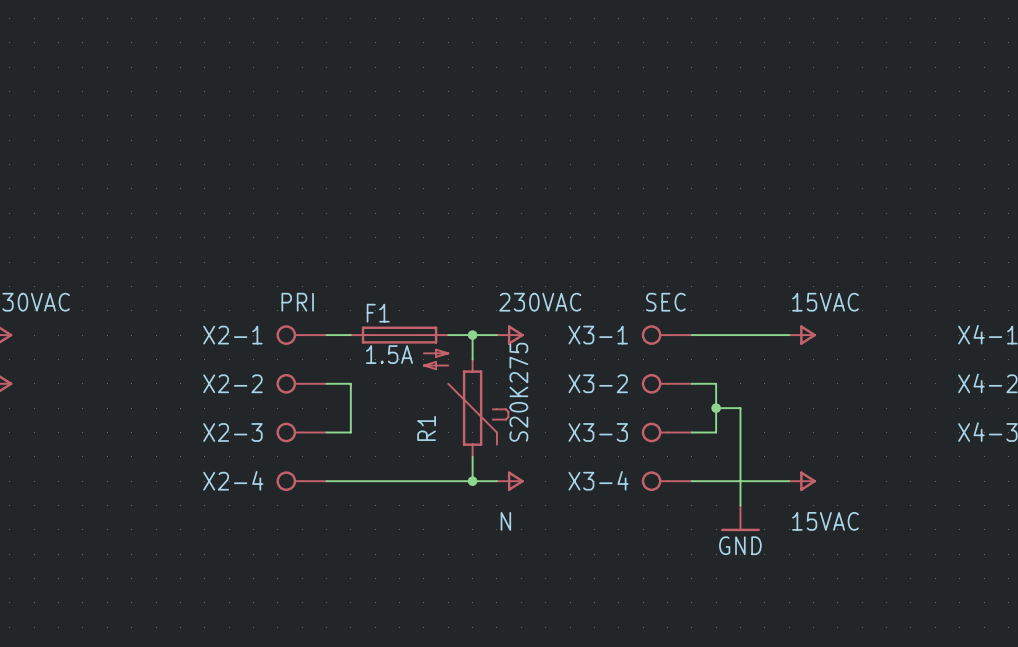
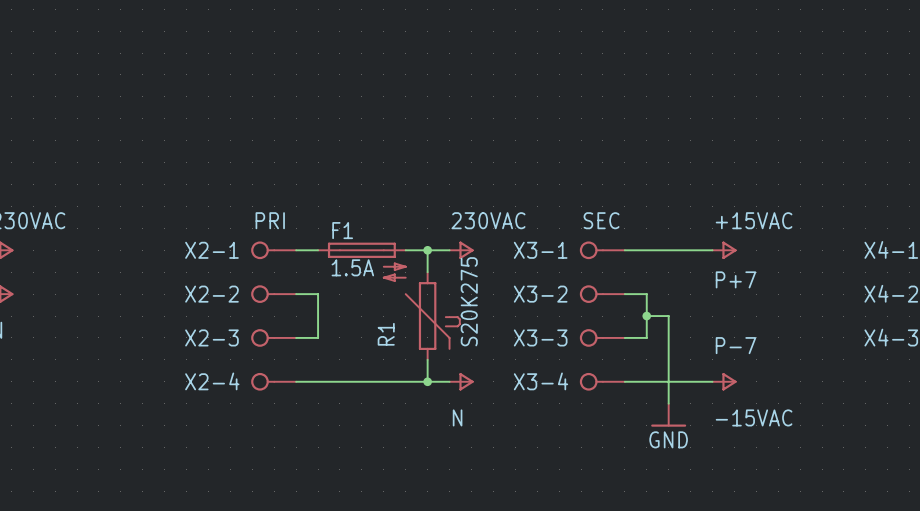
power symbol: 15VAC (802, 335) -> +15VAC (724, 250)
power symbol: 15VAC (802, 481) -> -15VAC (724, 381)

